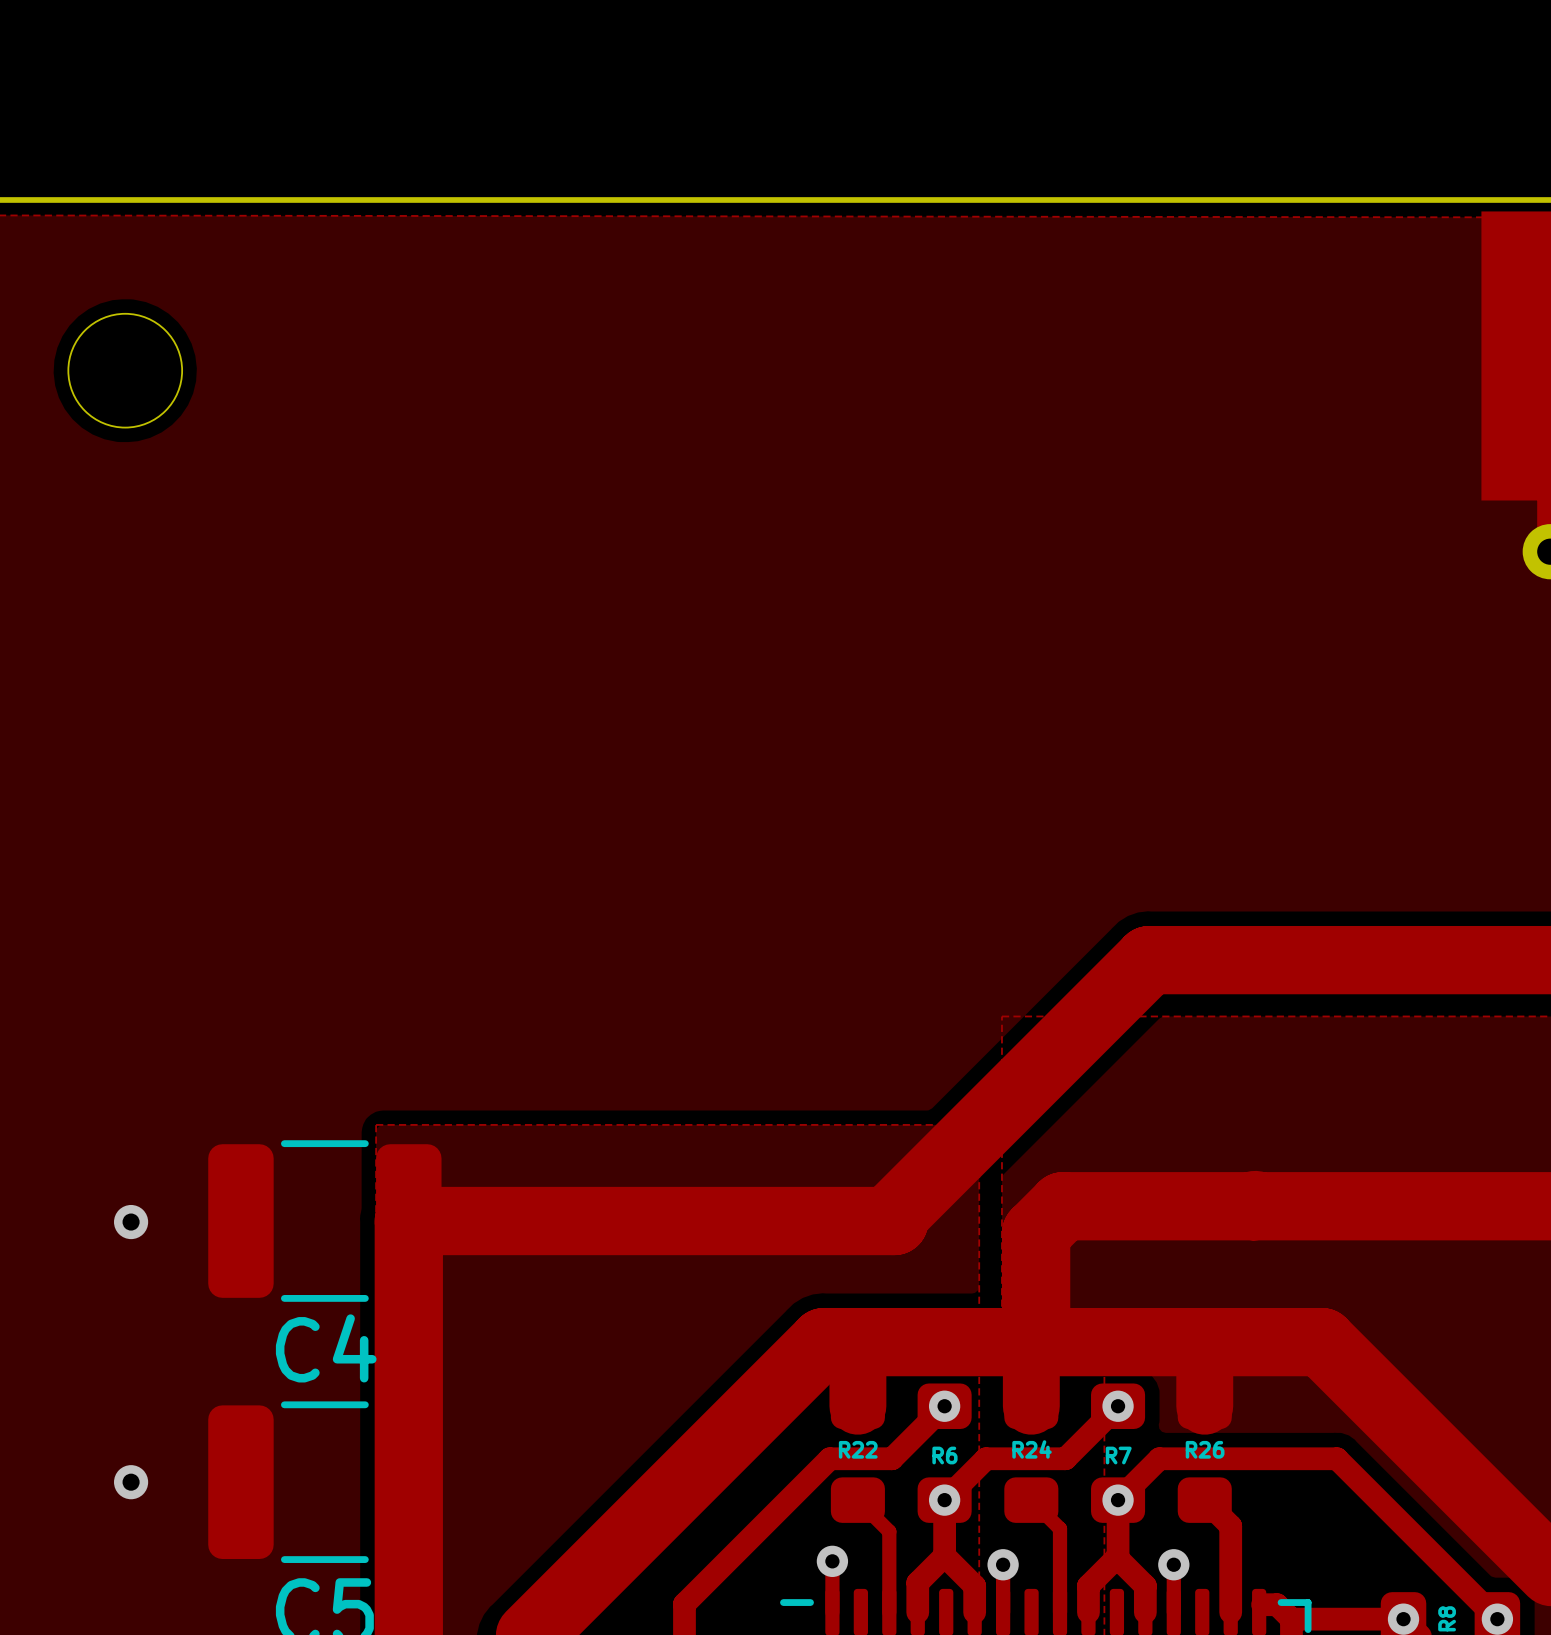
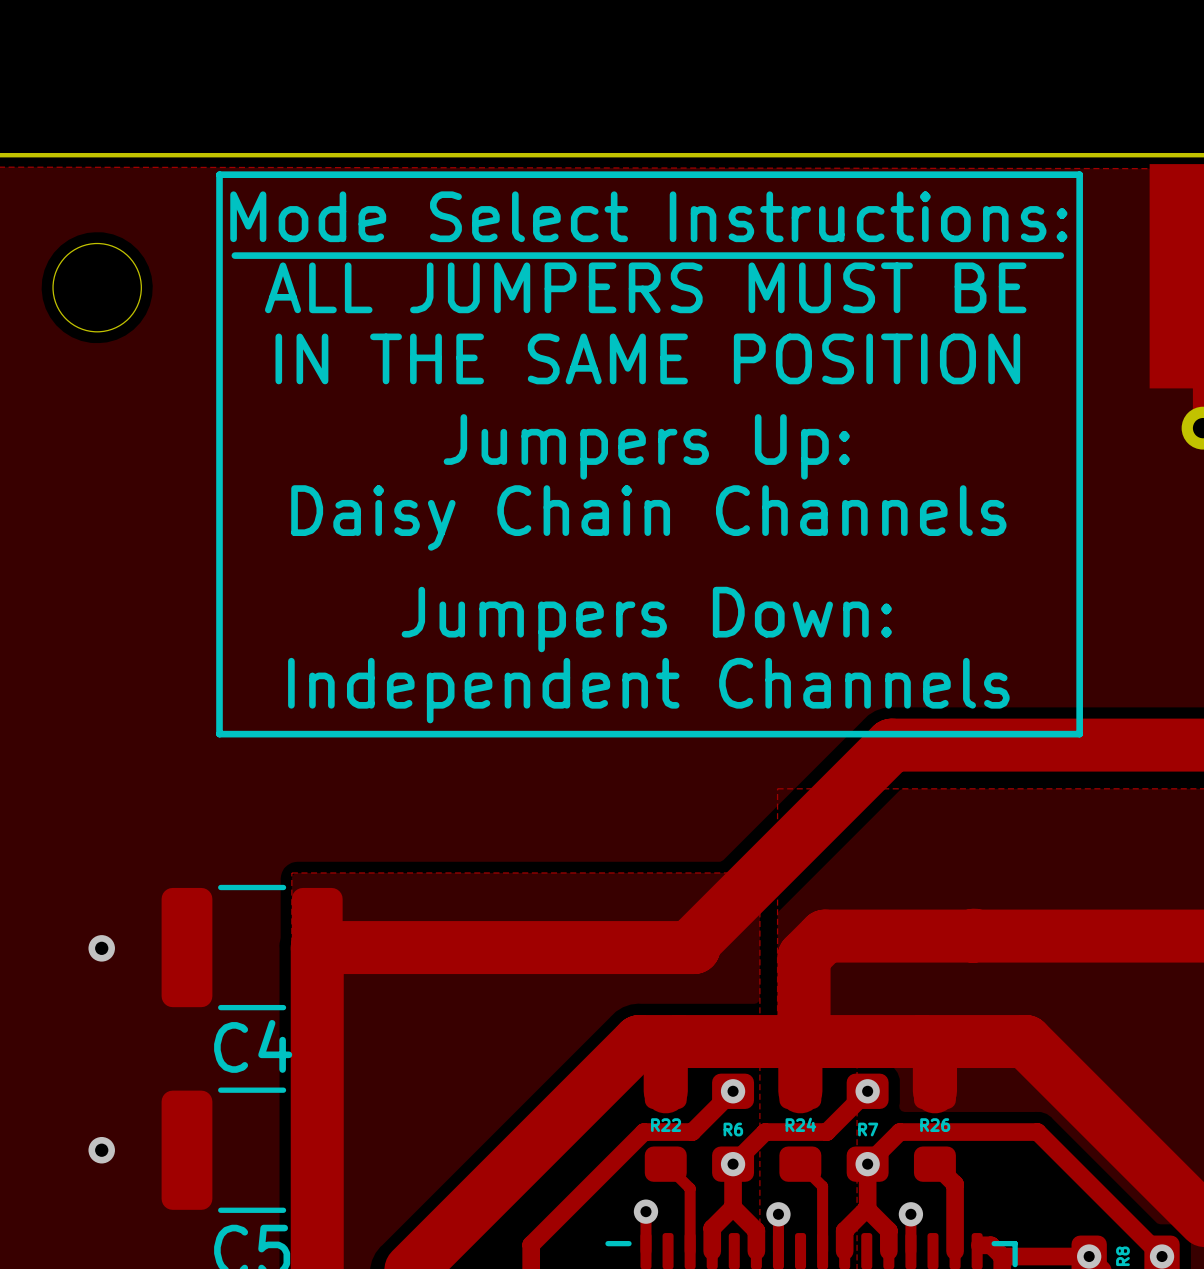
line: none -> (219, 174) (1079, 174) (1079, 734) (219, 734) (219, 174)
text: none -> Mode Select Instructions: (648, 216)
text: none -> ~{ ALL JUMPERS MUST BE } (647, 282)
text: none -> IN THE SAME POSITION (647, 358)
text: none -> Jumpers Up: (646, 446)
text: none -> Daisy Chain Channels (648, 517)
text: none -> Jumpers Down: (646, 619)
text: none -> Independent Channels (648, 690)

